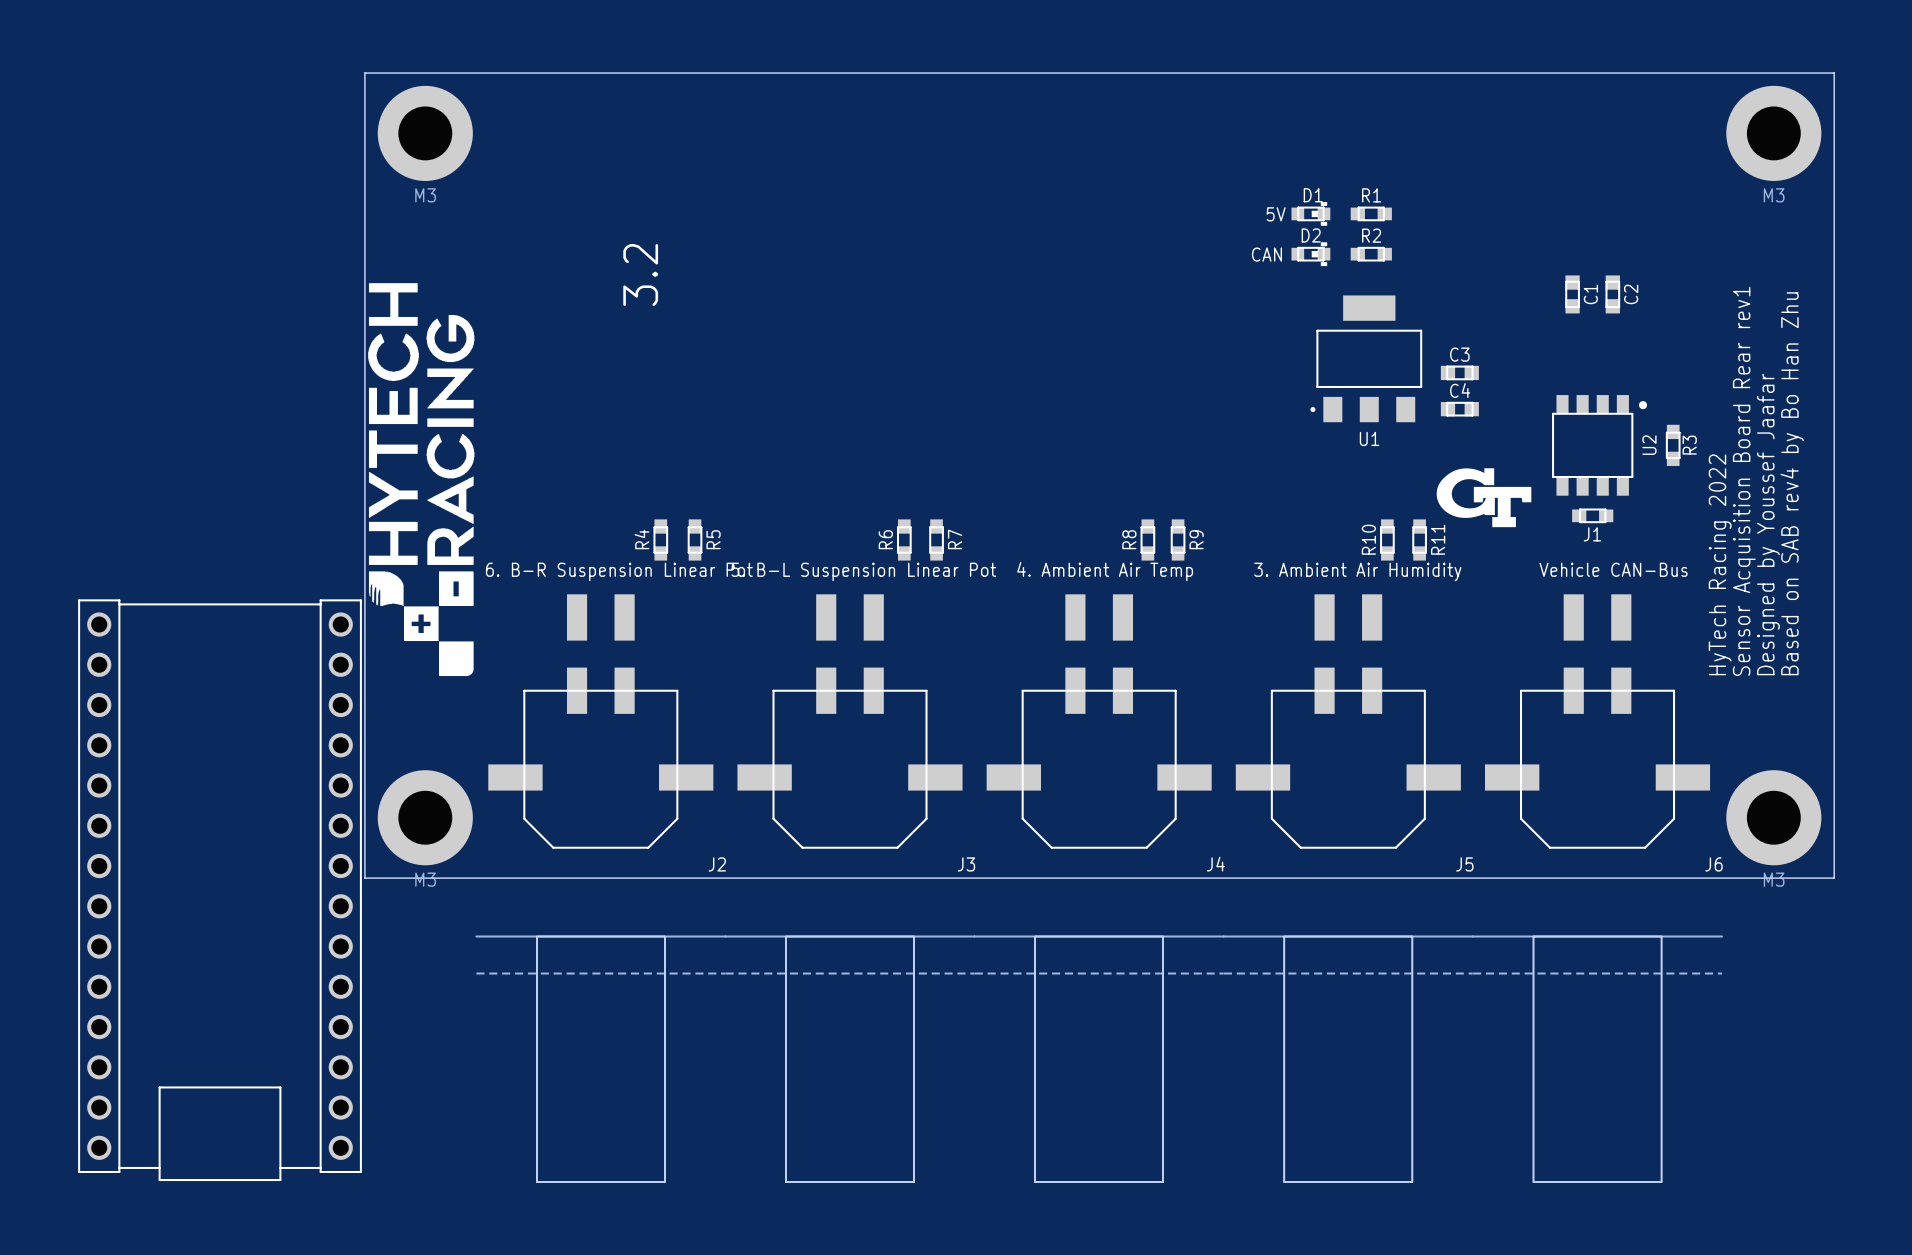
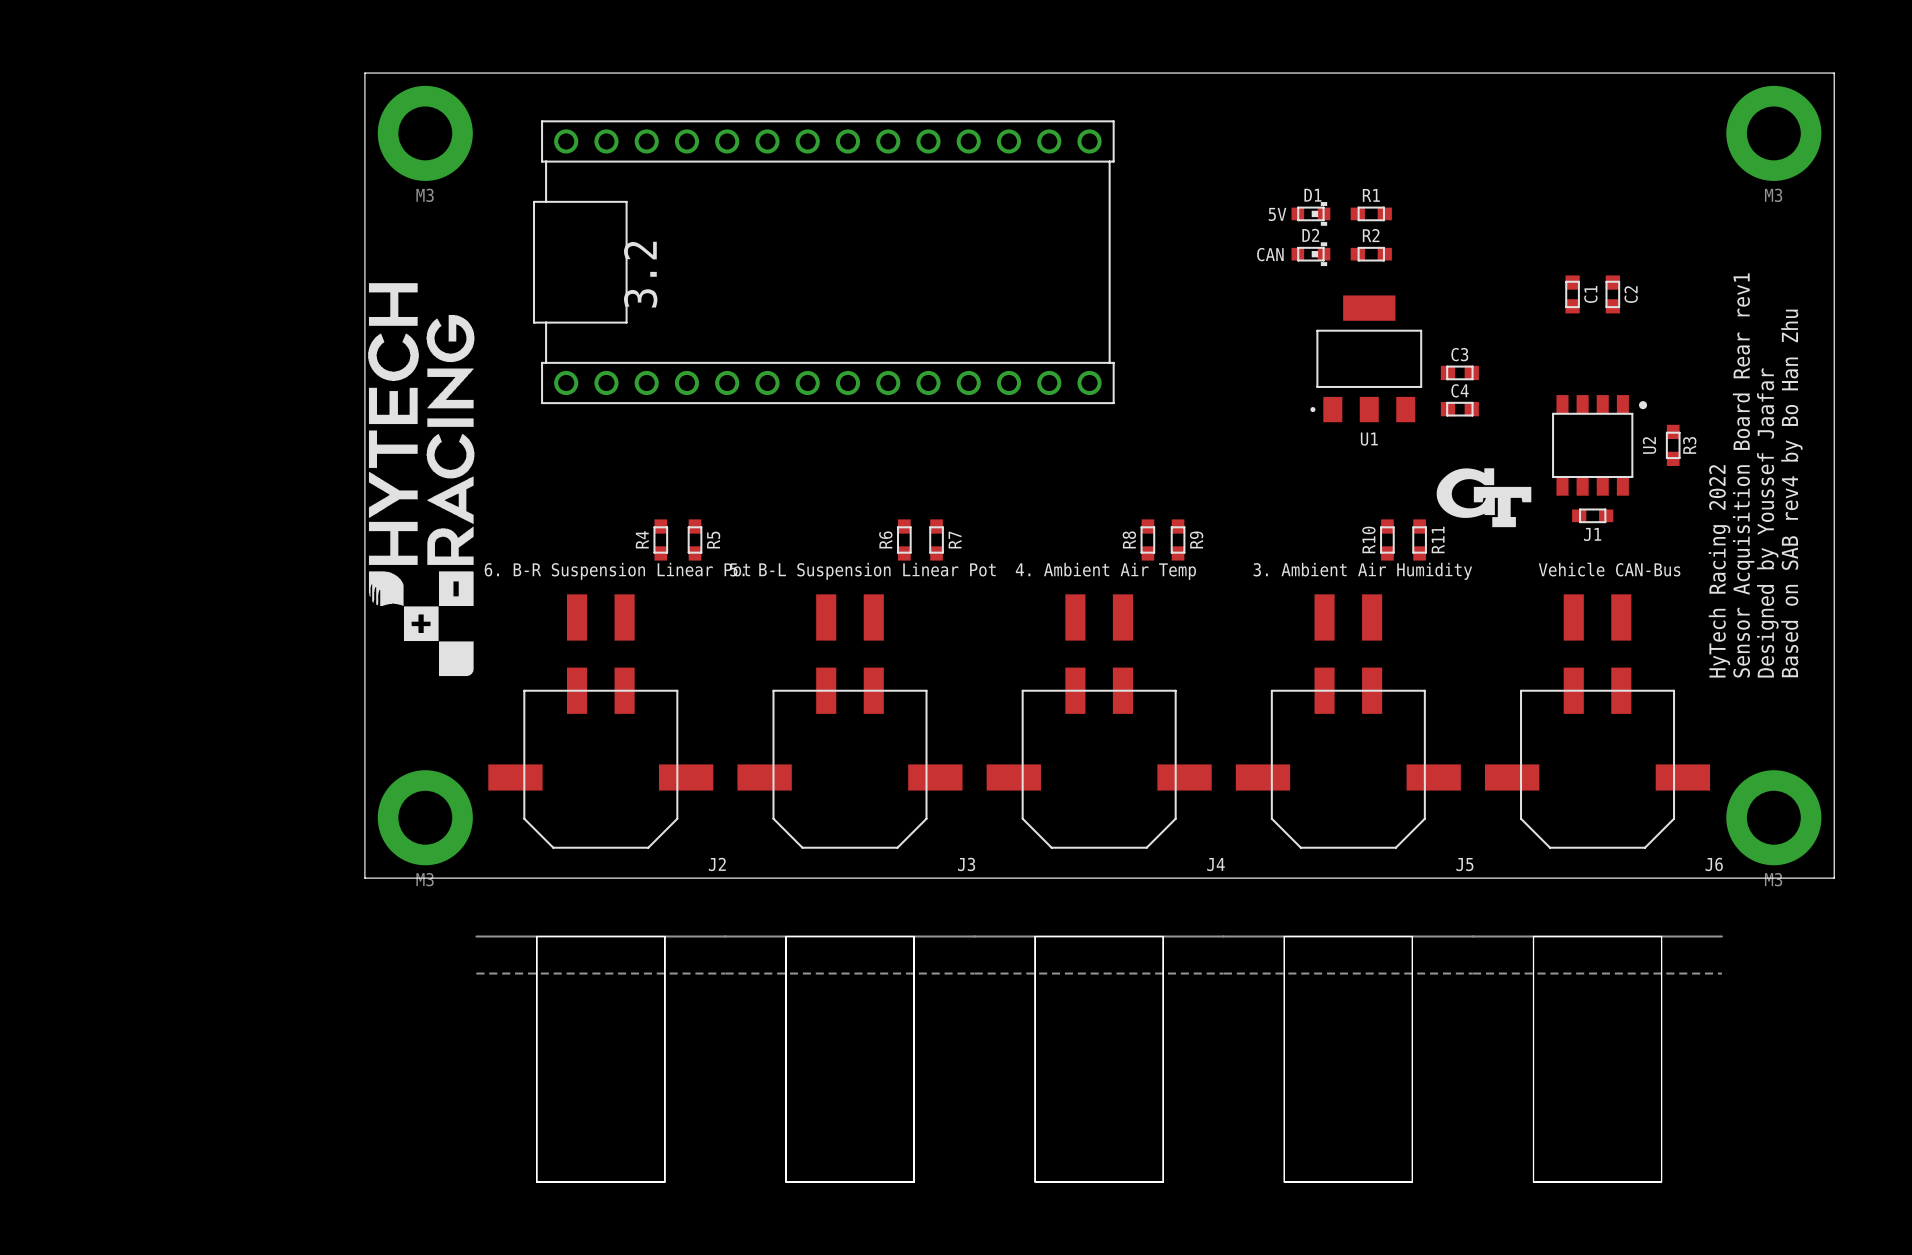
part: none -> (823, 262)
part: (220, 890) -> none

